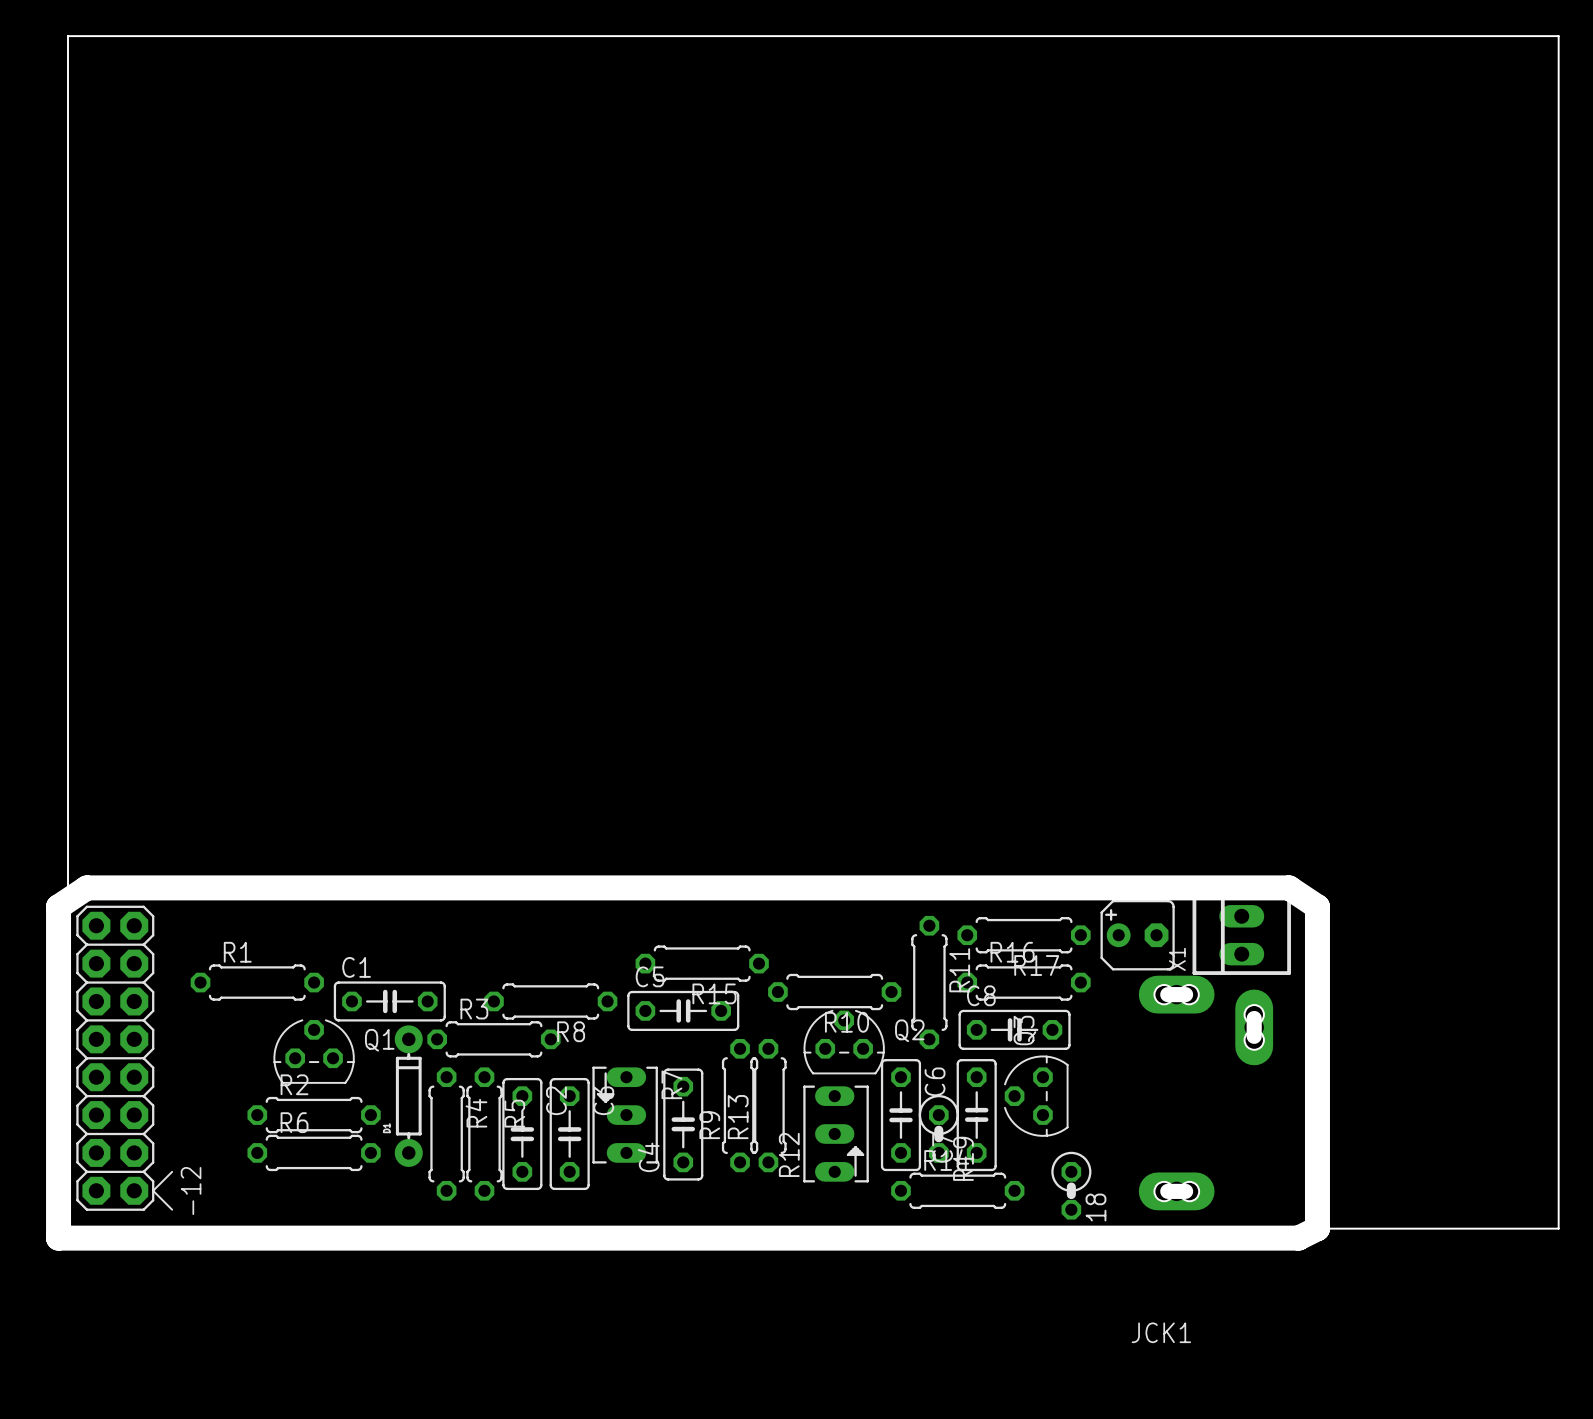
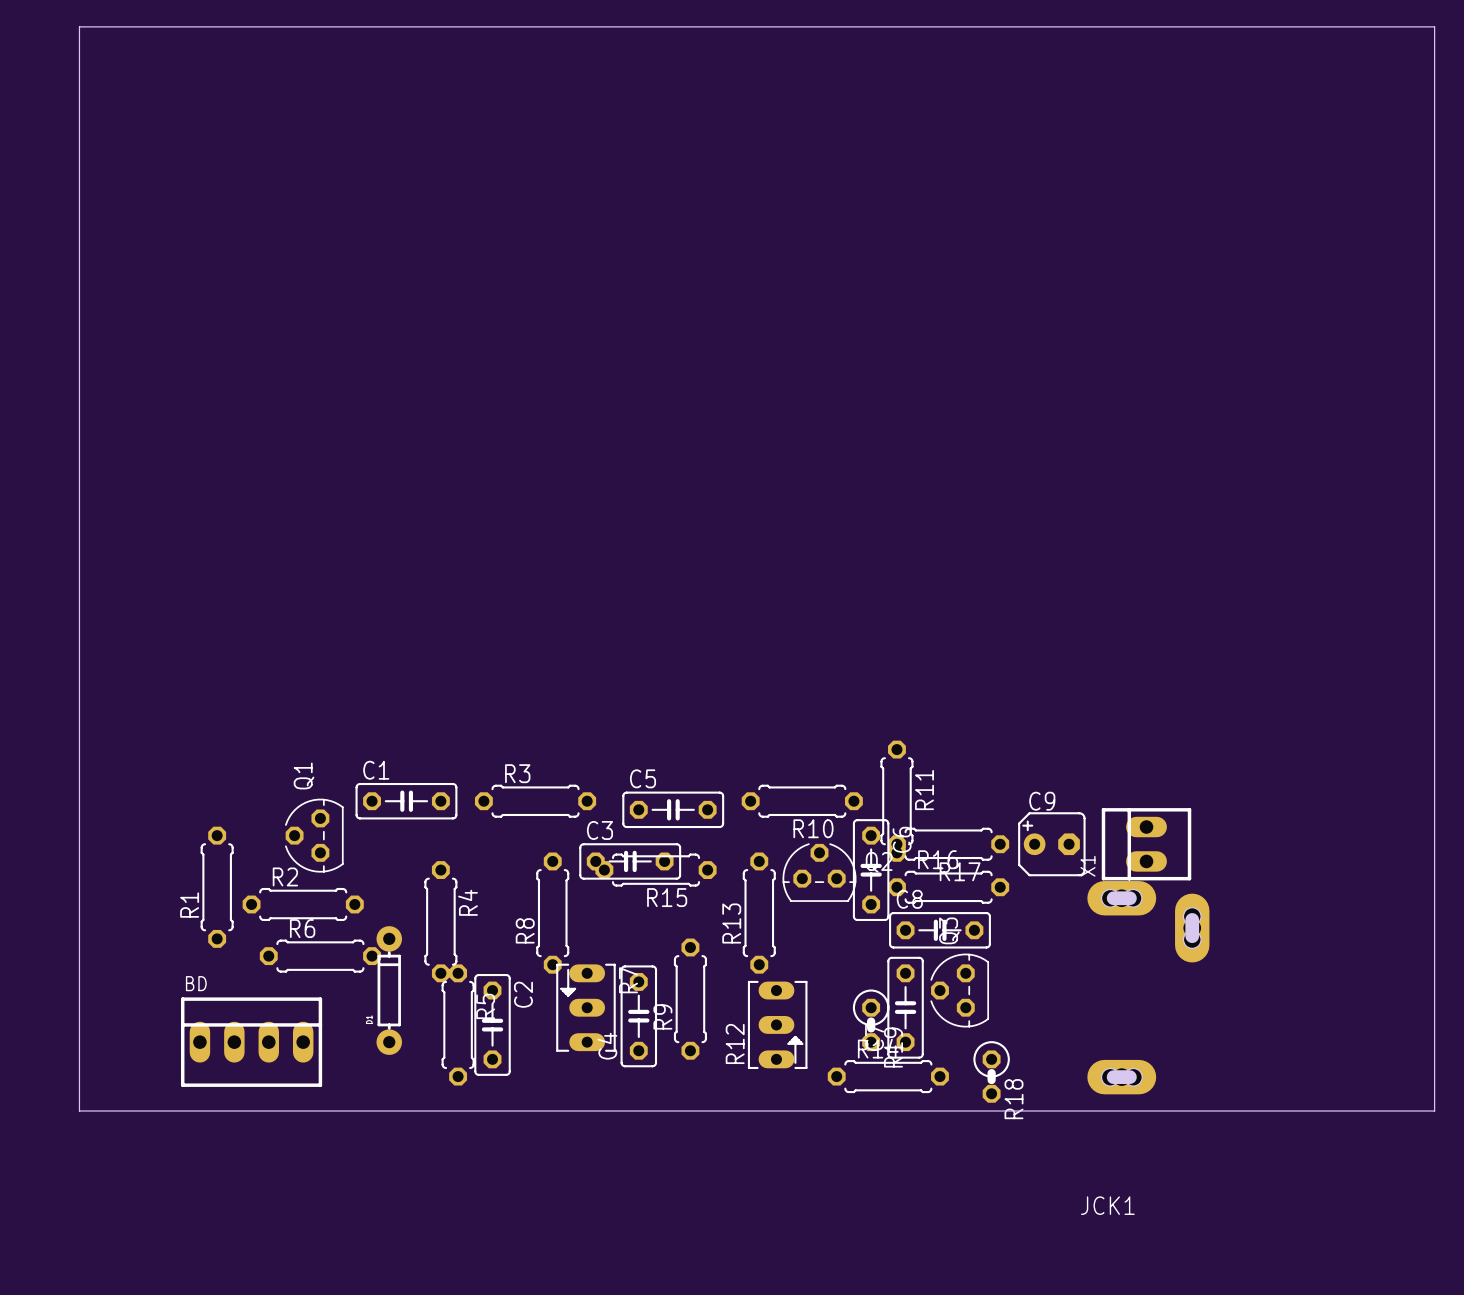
board edge: (86, 887) (58, 906) (58, 1238) (1298, 1238) (1317, 1228) (1317, 906) (1289, 887) (86, 887) -> none
R1 name position: R1 (237, 952) -> R1 (189, 905)
R1 rotation: 0° (257, 982) -> 90° clockwise (217, 887)
R11 position: (929, 982) -> (896, 801)
R10 position: (834, 992) -> (802, 801)
C1 position: (389, 1001) -> (406, 801)
R8 rotation: 0° (550, 1001) -> 90° clockwise (552, 913)
C5 position: (683, 1010) -> (673, 809)
R3 position: (493, 1039) -> (535, 801)
Q2 position: (844, 1042) -> (819, 872)
Q1 rotation: 0° (314, 1051) -> 90° counterclockwise (314, 835)
Q1 position: (314, 1051) -> (314, 835)
part: (124, 1058) -> none
JCK1 position: (1205, 1093) -> (1148, 987)
R13 position: (768, 1105) -> (759, 913)
R2 position: (314, 1115) -> (303, 904)
C6 position: (900, 1115) -> (871, 870)
R4 position: (446, 1134) -> (440, 921)
C3 rotation: 0° (569, 1134) -> 90° counterclockwise (630, 861)
C3 position: (569, 1134) -> (630, 861)
BD: none -> (251, 1042)
R6 position: (314, 1152) -> (320, 956)

